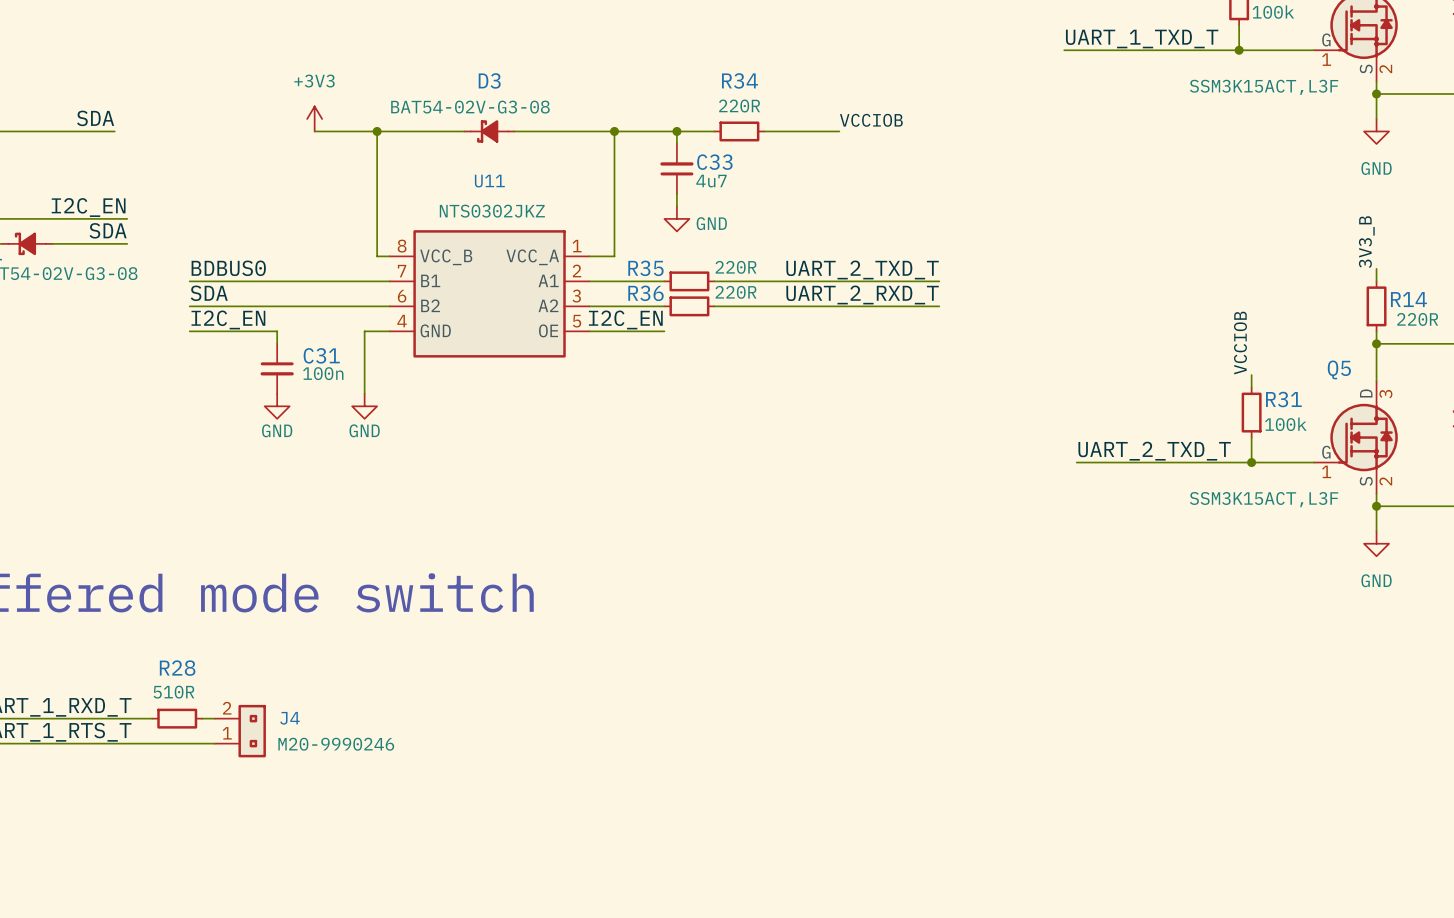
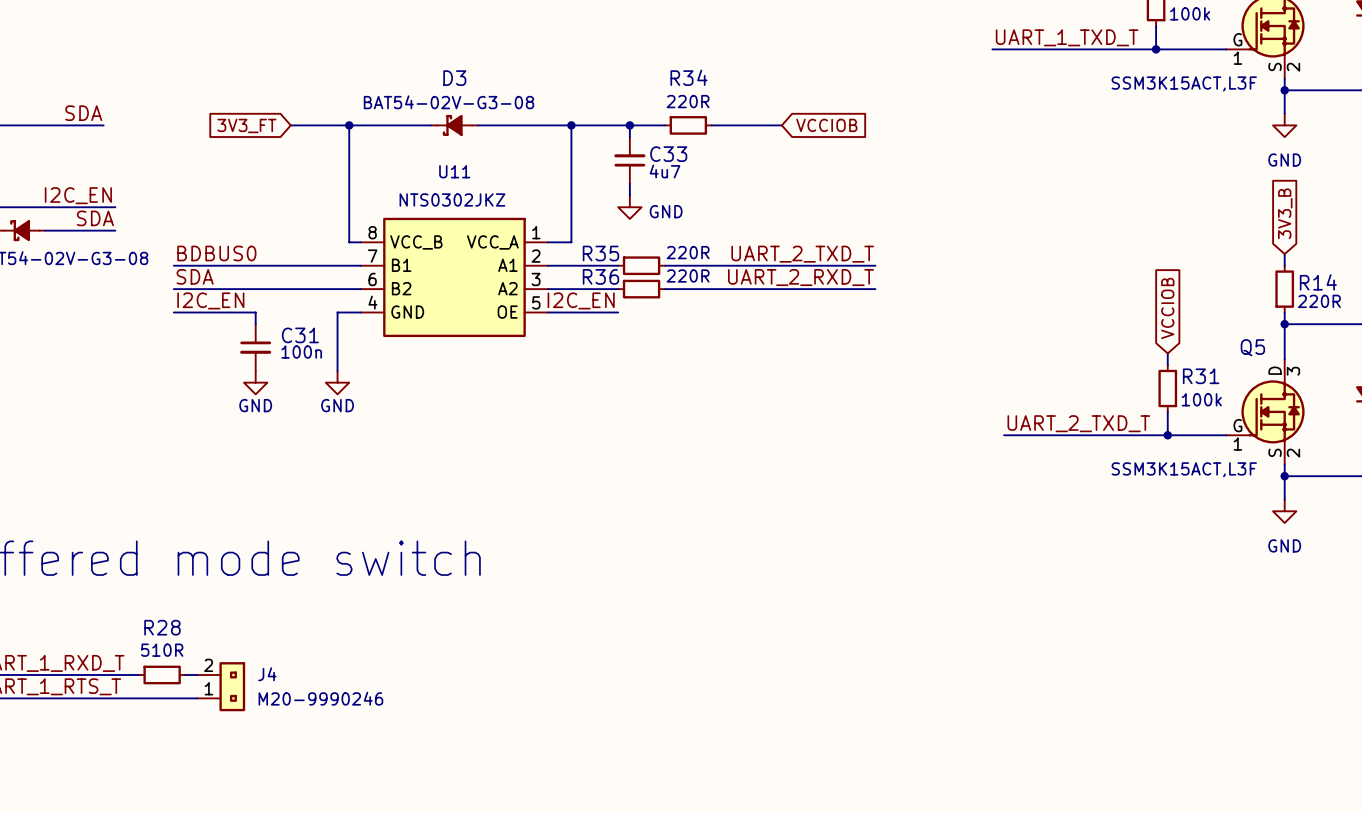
power symbol: +3V3 (314, 118) -> none
label: VCCIOB (871, 120) -> none
global label: none -> VCCIOB (826, 125)
global label: none -> 3V3_FT (246, 125)
global label: none -> 3V3_B (1285, 213)
label: 3V3_B (1366, 242) -> none
global label: none -> VCCIOB (1167, 308)
label: VCCIOB (1240, 343) -> none

